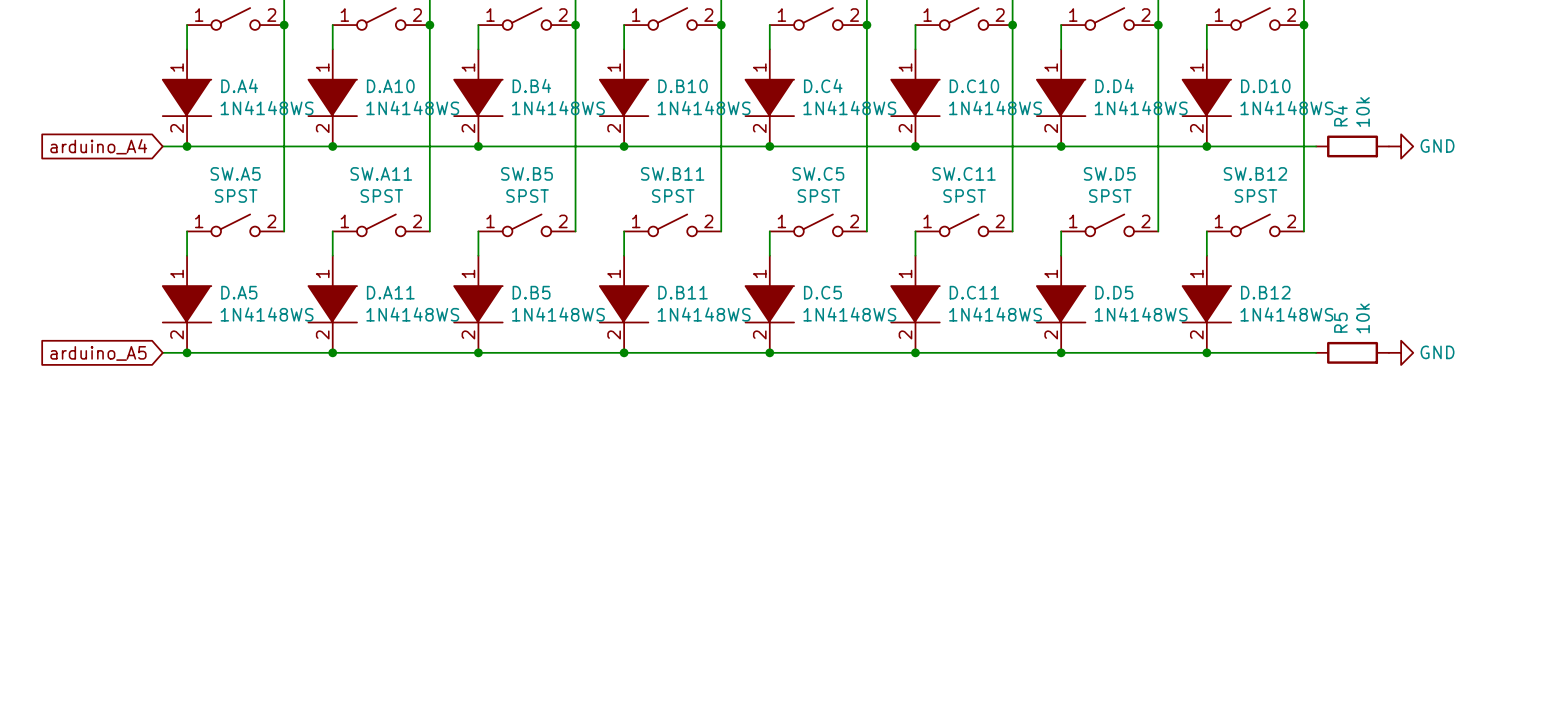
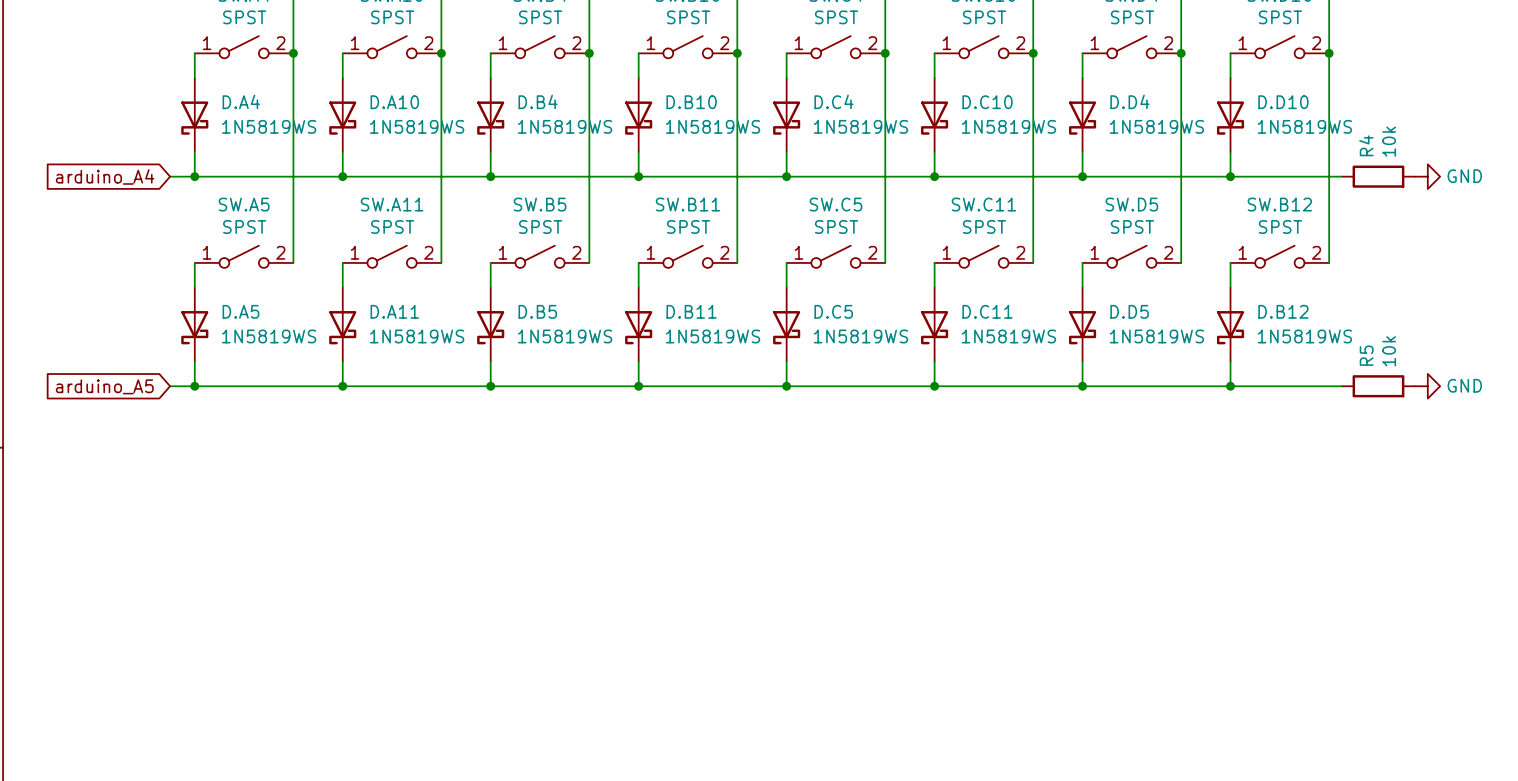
D.A4 symbol: [162, 49, 212, 147] -> [181, 78, 209, 152]
D.A10 symbol: [308, 49, 358, 147] -> [329, 78, 357, 152]
D.B4 symbol: [454, 49, 503, 147] -> [477, 78, 505, 152]
D.B10 symbol: [599, 49, 649, 147] -> [625, 78, 653, 152]
D.C4 symbol: [745, 49, 795, 147] -> [773, 78, 801, 152]
D.C10 symbol: [891, 49, 940, 147] -> [921, 78, 949, 152]
D.D4 symbol: [1036, 49, 1086, 147] -> [1068, 78, 1097, 152]
D.D10 symbol: [1182, 49, 1232, 147] -> [1216, 78, 1245, 152]
D.A4 value: 1N4148WS (267, 108) -> 1N5819WS (269, 126)
D.A10 value: 1N4148WS (412, 108) -> 1N5819WS (417, 126)
D.B4 value: 1N4148WS (558, 108) -> 1N5819WS (565, 126)
D.B10 value: 1N4148WS (704, 108) -> 1N5819WS (713, 126)
D.C4 value: 1N4148WS (849, 108) -> 1N5819WS (861, 126)
D.C10 value: 1N4148WS (995, 108) -> 1N5819WS (1008, 126)
D.D4 value: 1N4148WS (1141, 108) -> 1N5819WS (1156, 126)
D.D10 value: 1N4148WS (1286, 108) -> 1N5819WS (1304, 126)
D.A5 symbol: [162, 255, 212, 353] -> [181, 287, 209, 362]
D.A11 symbol: [308, 255, 358, 353] -> [329, 287, 357, 362]
D.B5 symbol: [454, 255, 503, 353] -> [477, 287, 505, 362]
D.B11 symbol: [599, 255, 649, 353] -> [625, 287, 653, 362]
D.C5 symbol: [745, 255, 795, 353] -> [773, 287, 801, 362]
D.C11 symbol: [891, 255, 940, 353] -> [921, 287, 949, 362]
D.D5 symbol: [1036, 255, 1086, 353] -> [1068, 287, 1097, 362]
D.B12 symbol: [1182, 255, 1232, 353] -> [1216, 287, 1245, 362]
D.A5 value: 1N4148WS (267, 314) -> 1N5819WS (269, 336)
D.A11 value: 1N4148WS (412, 314) -> 1N5819WS (417, 336)
D.B5 value: 1N4148WS (558, 314) -> 1N5819WS (565, 336)
D.B11 value: 1N4148WS (704, 314) -> 1N5819WS (713, 336)
D.C5 value: 1N4148WS (849, 314) -> 1N5819WS (861, 336)
D.C11 value: 1N4148WS (995, 314) -> 1N5819WS (1008, 336)
D.D5 value: 1N4148WS (1141, 314) -> 1N5819WS (1156, 336)
D.B12 value: 1N4148WS (1286, 314) -> 1N5819WS (1304, 336)

